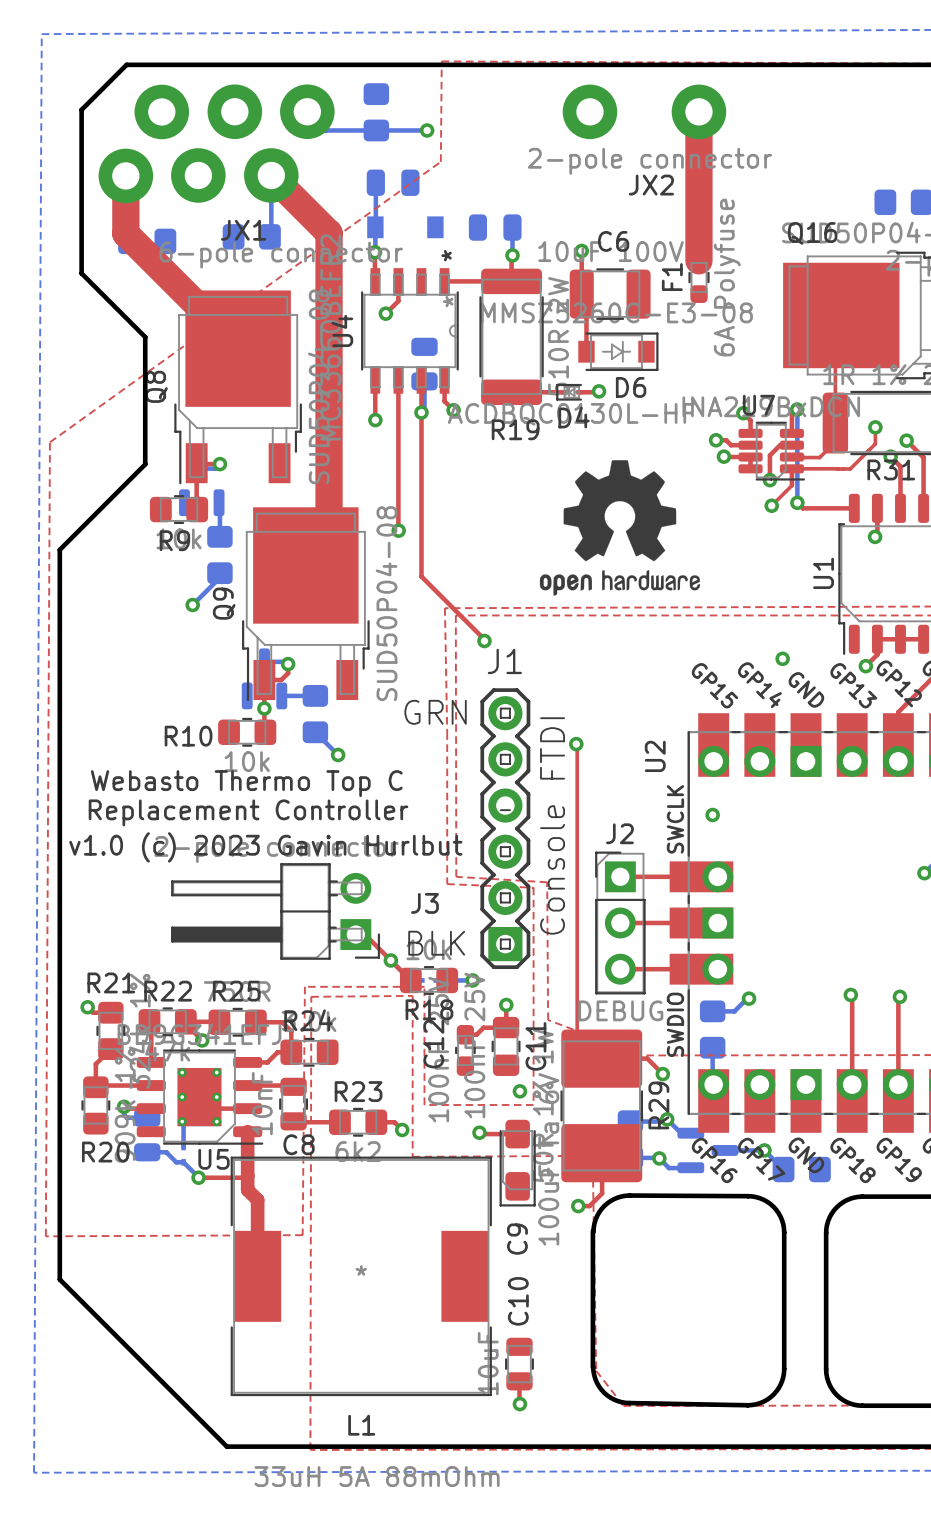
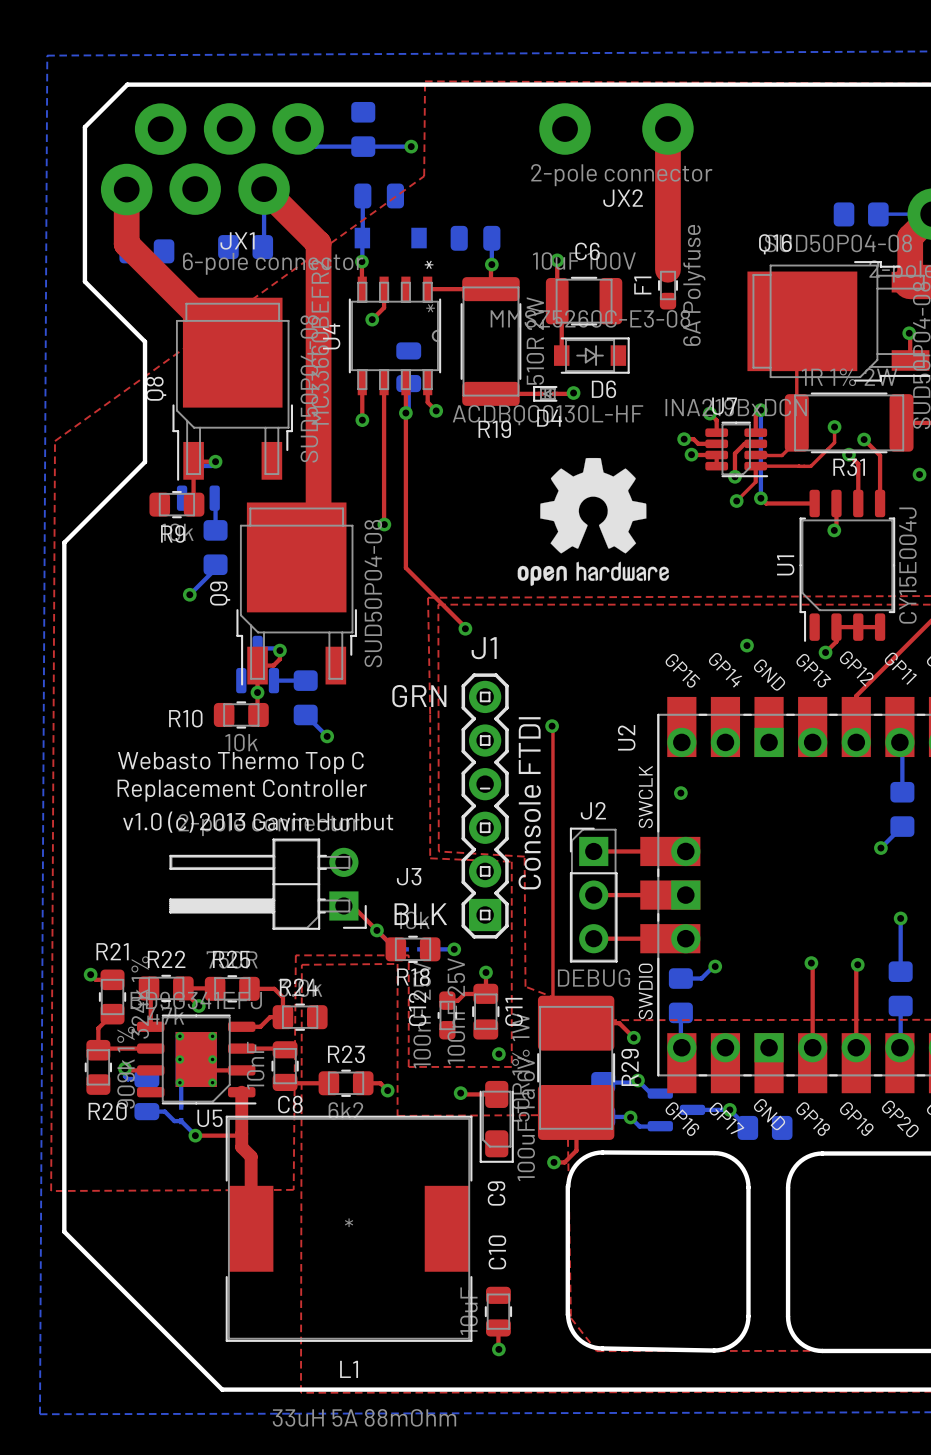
text: v1.0 (c) 2023 Gavin Hurlbut (265, 847) -> v1.0 (c) 2013 Gavin Hurlbut (258, 822)

